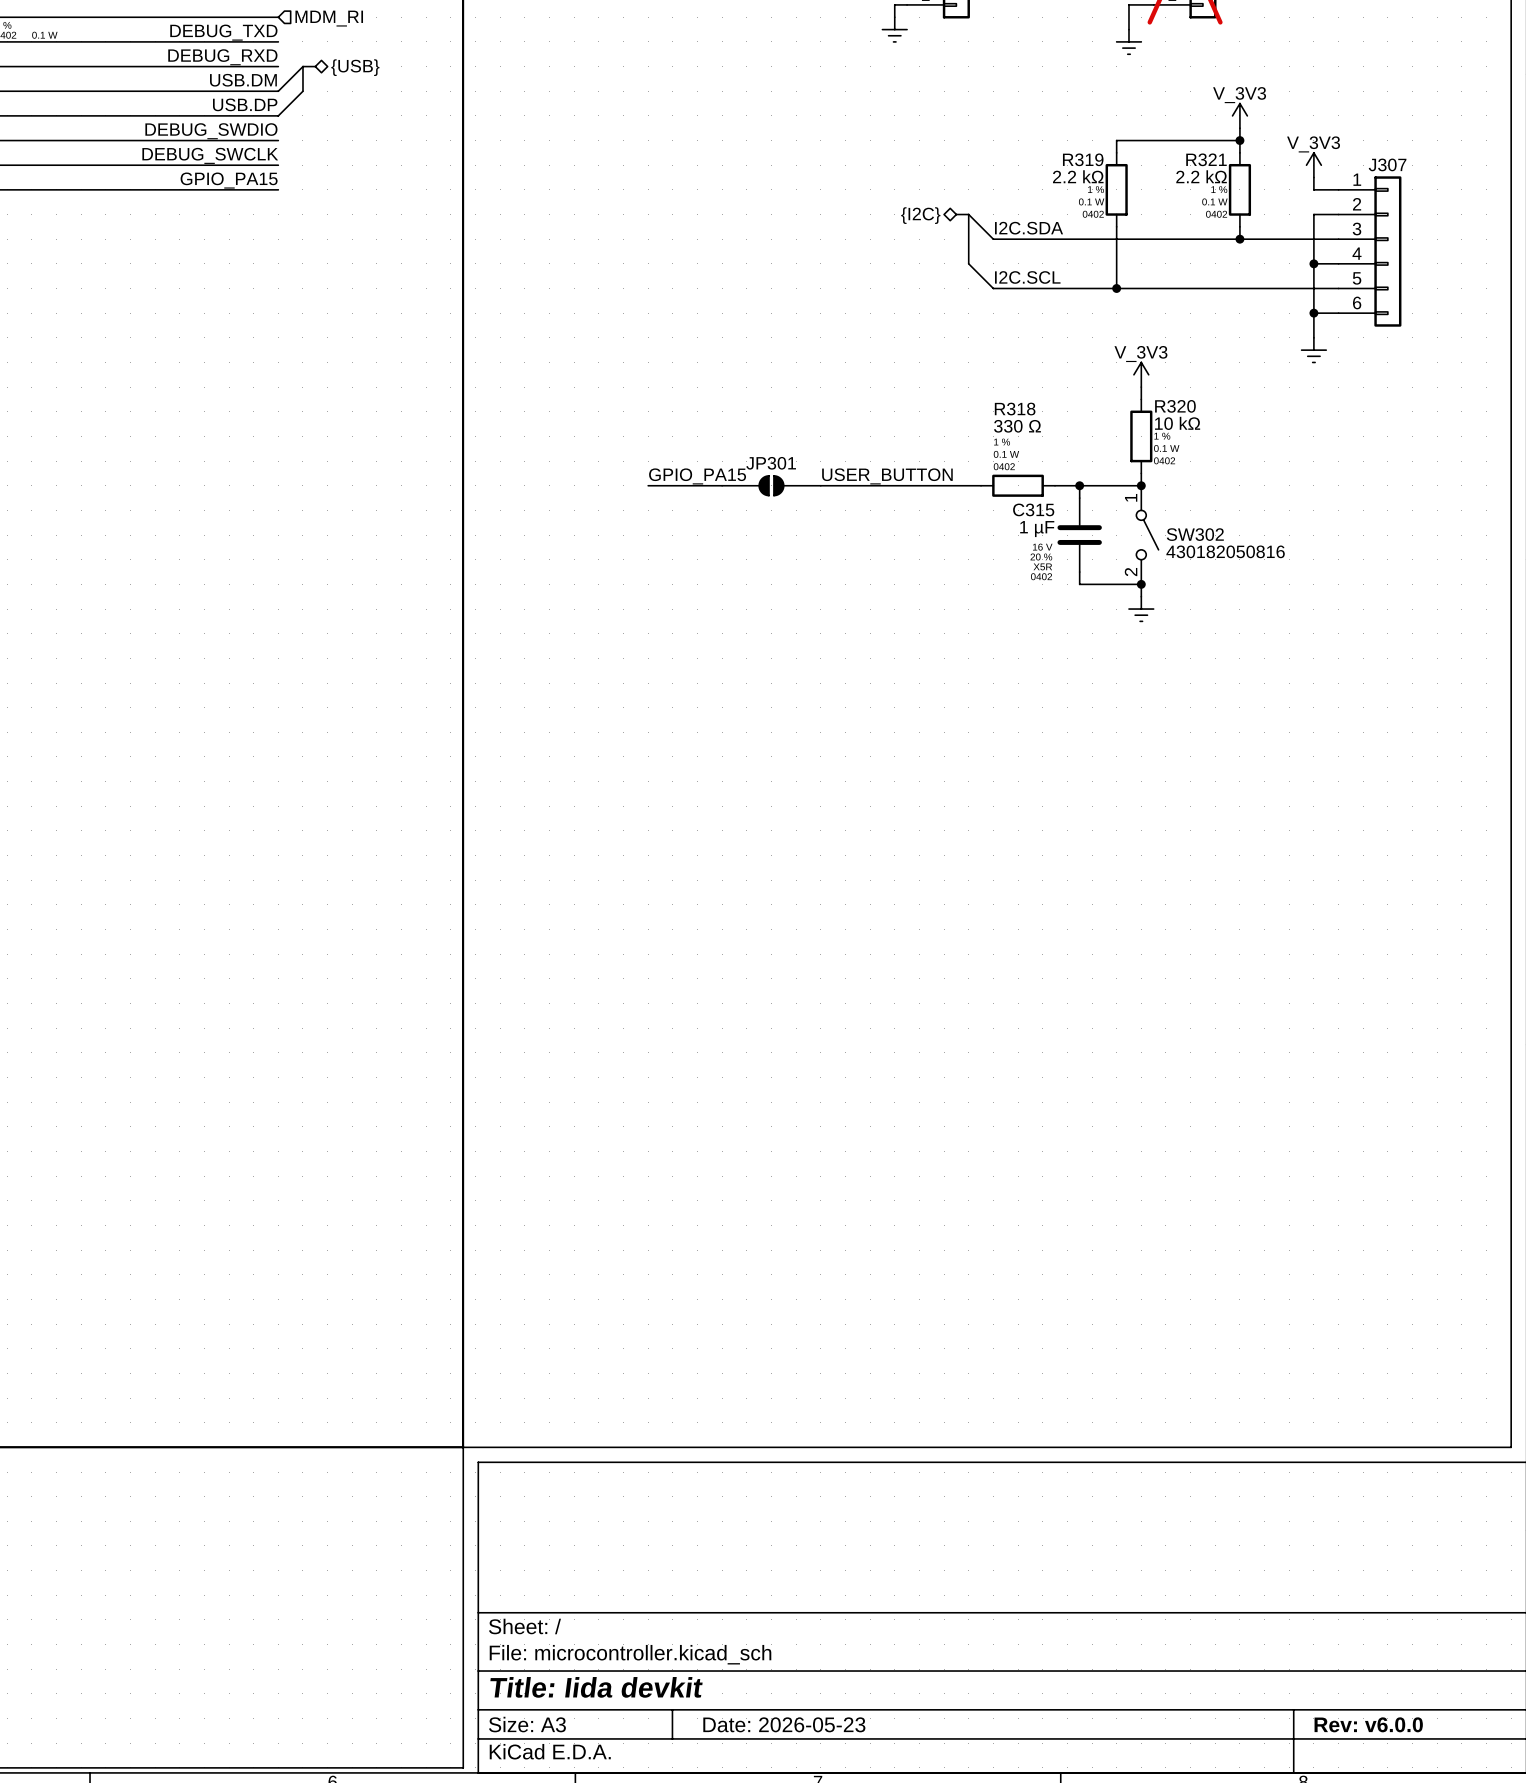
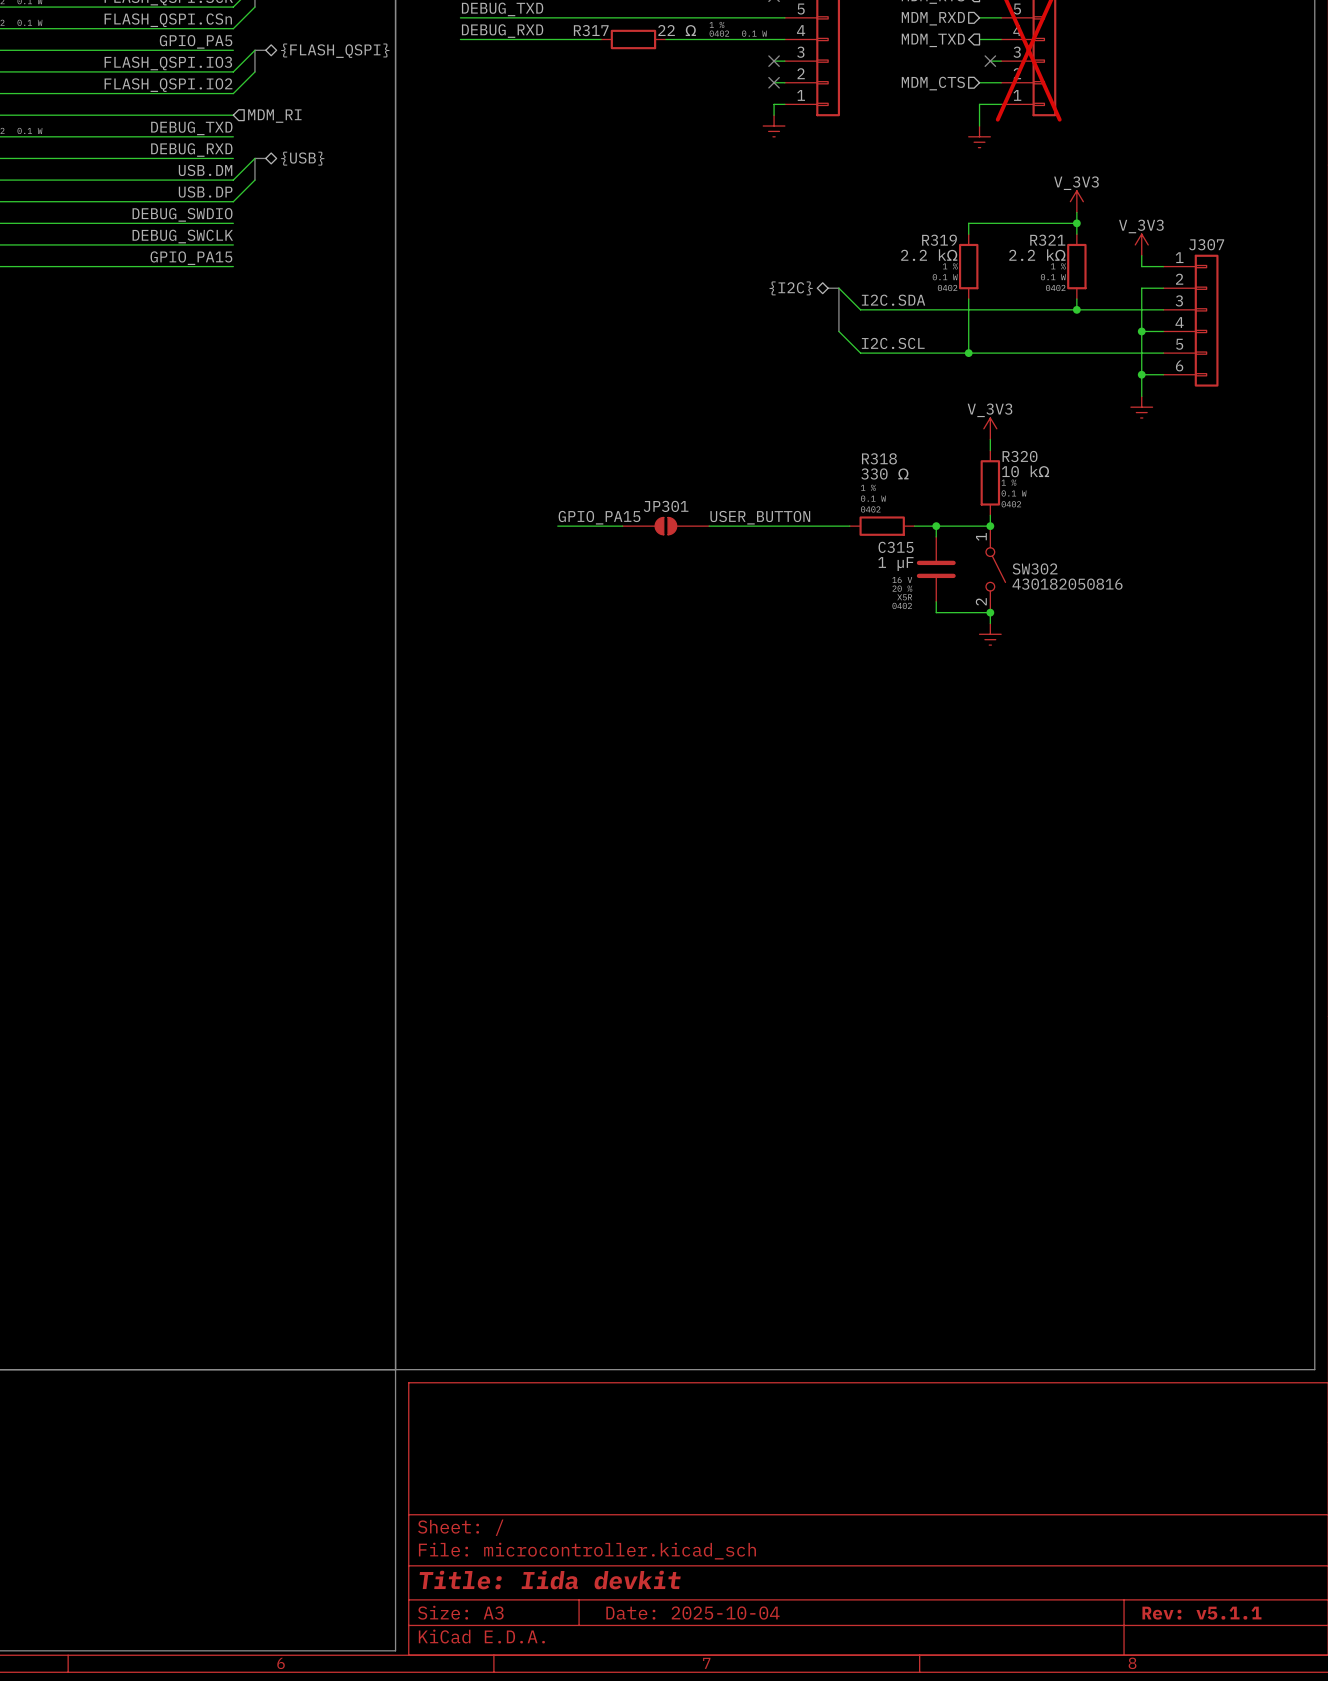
title block: Date: 2026-05-23 (784, 1724) -> Date: 2025-10-04 (692, 1613)
title block: Rev: v6.0.0 (1368, 1724) -> Rev: v5.1.1 (1201, 1613)

